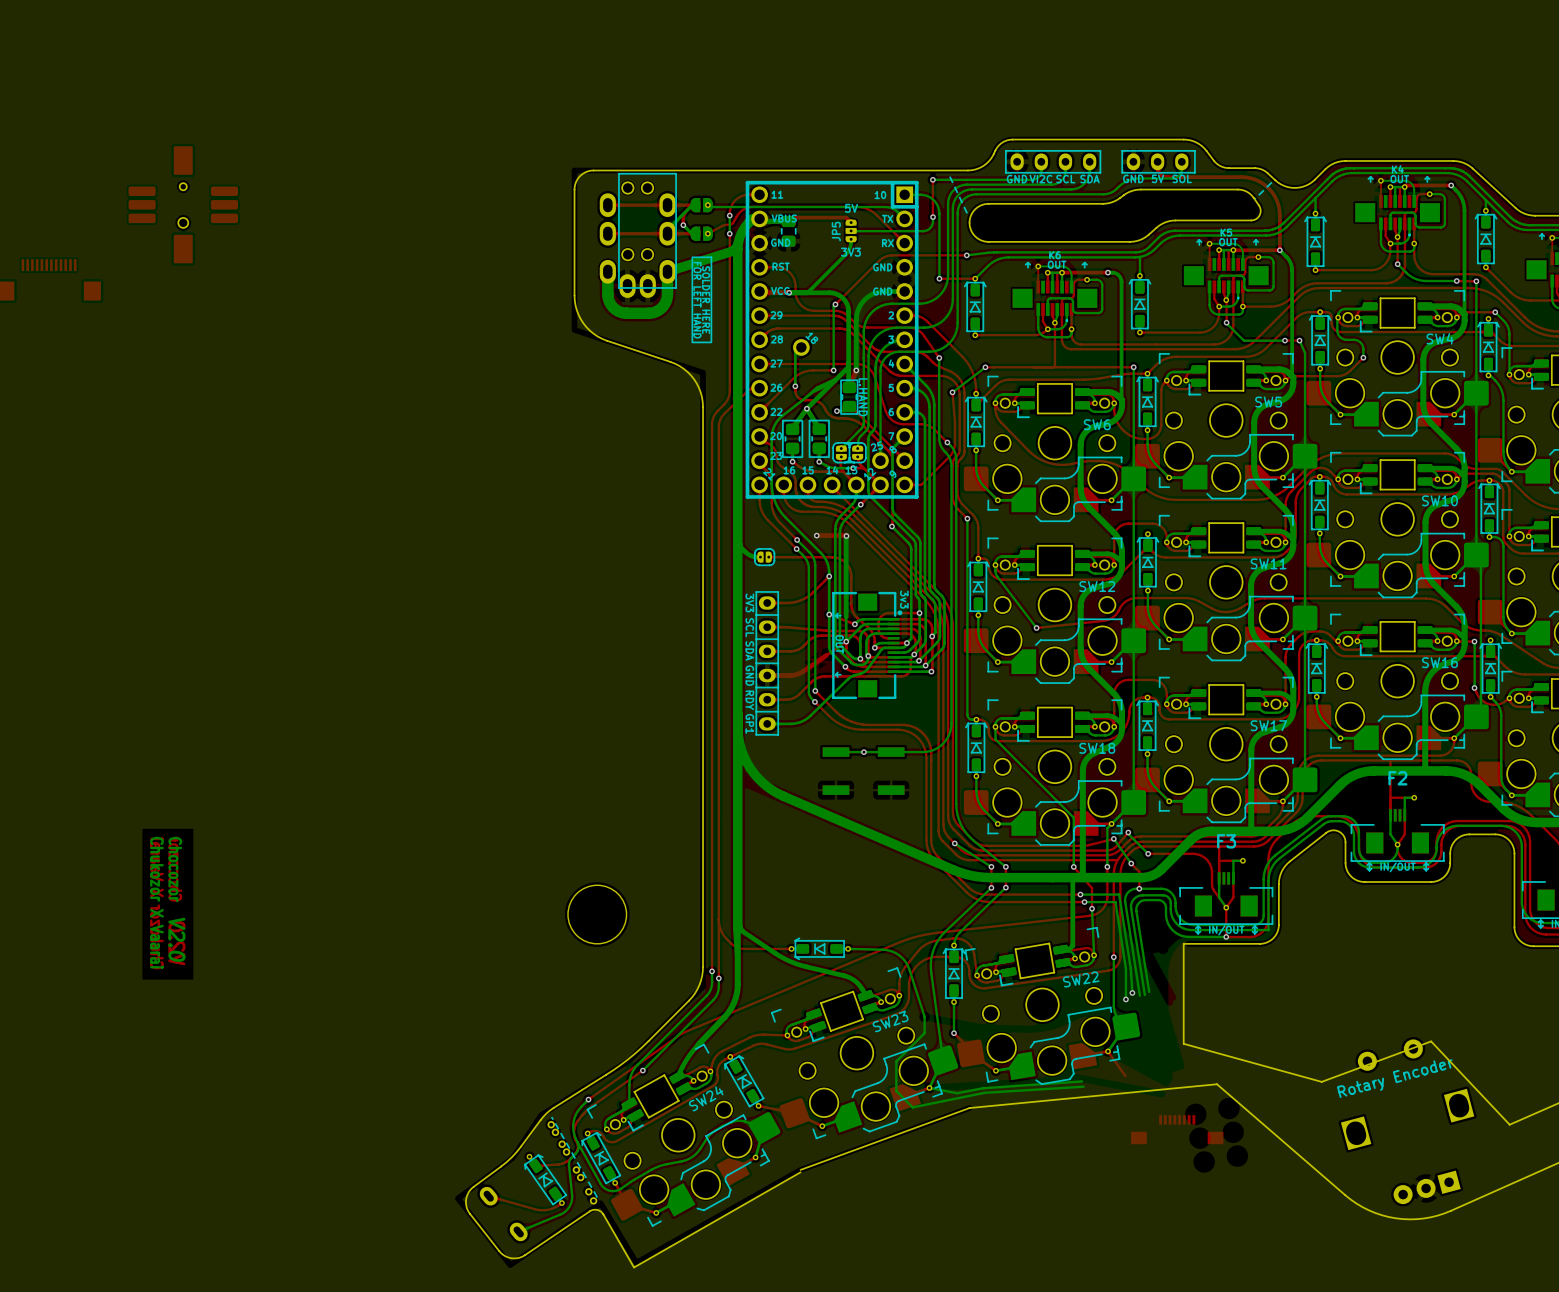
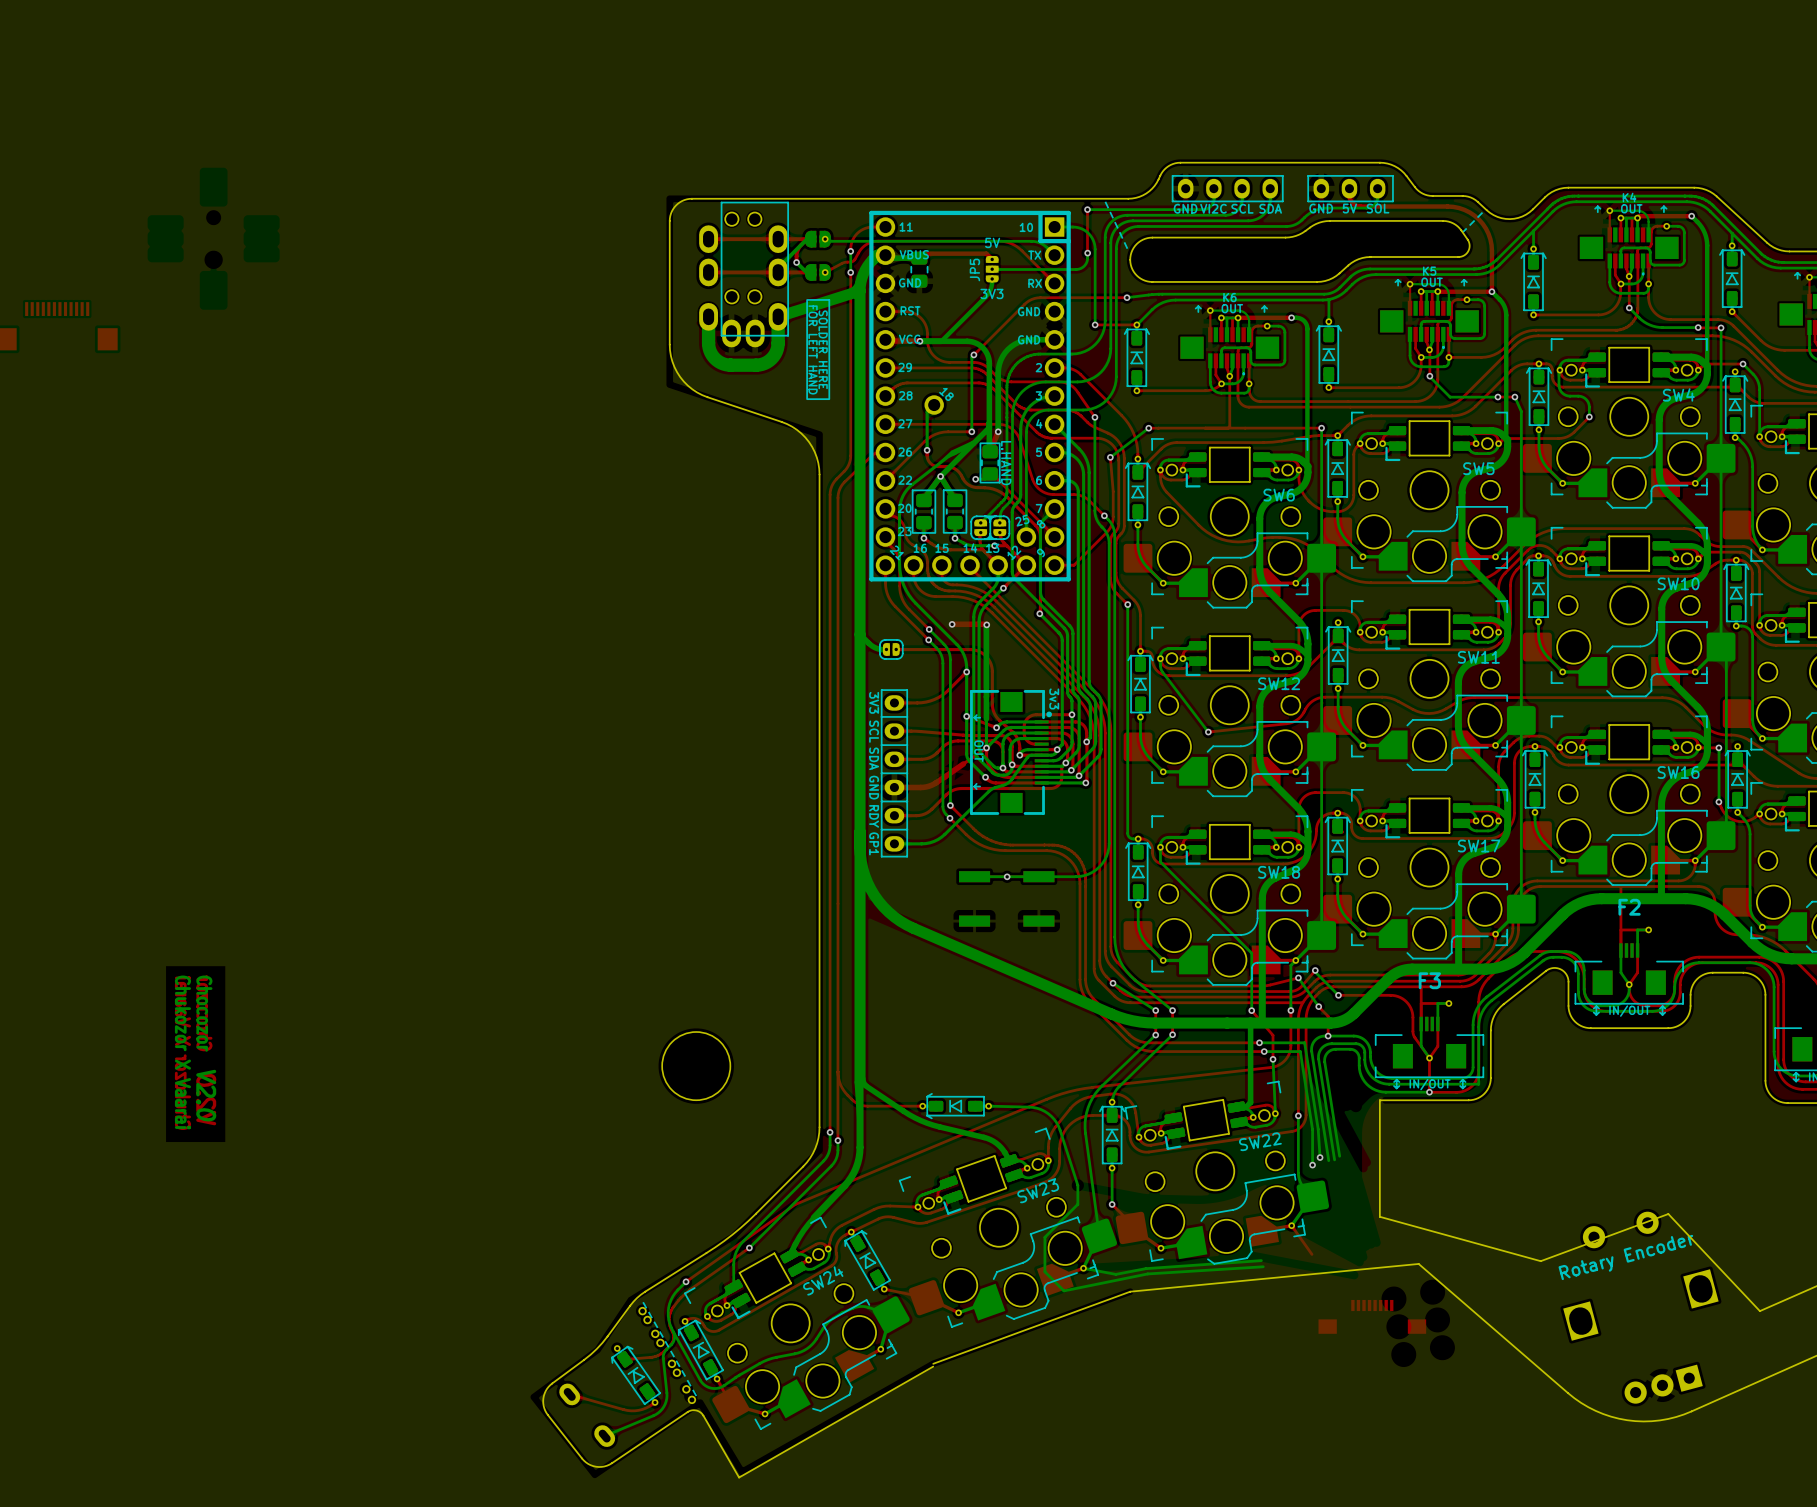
part: (183, 204) -> none

